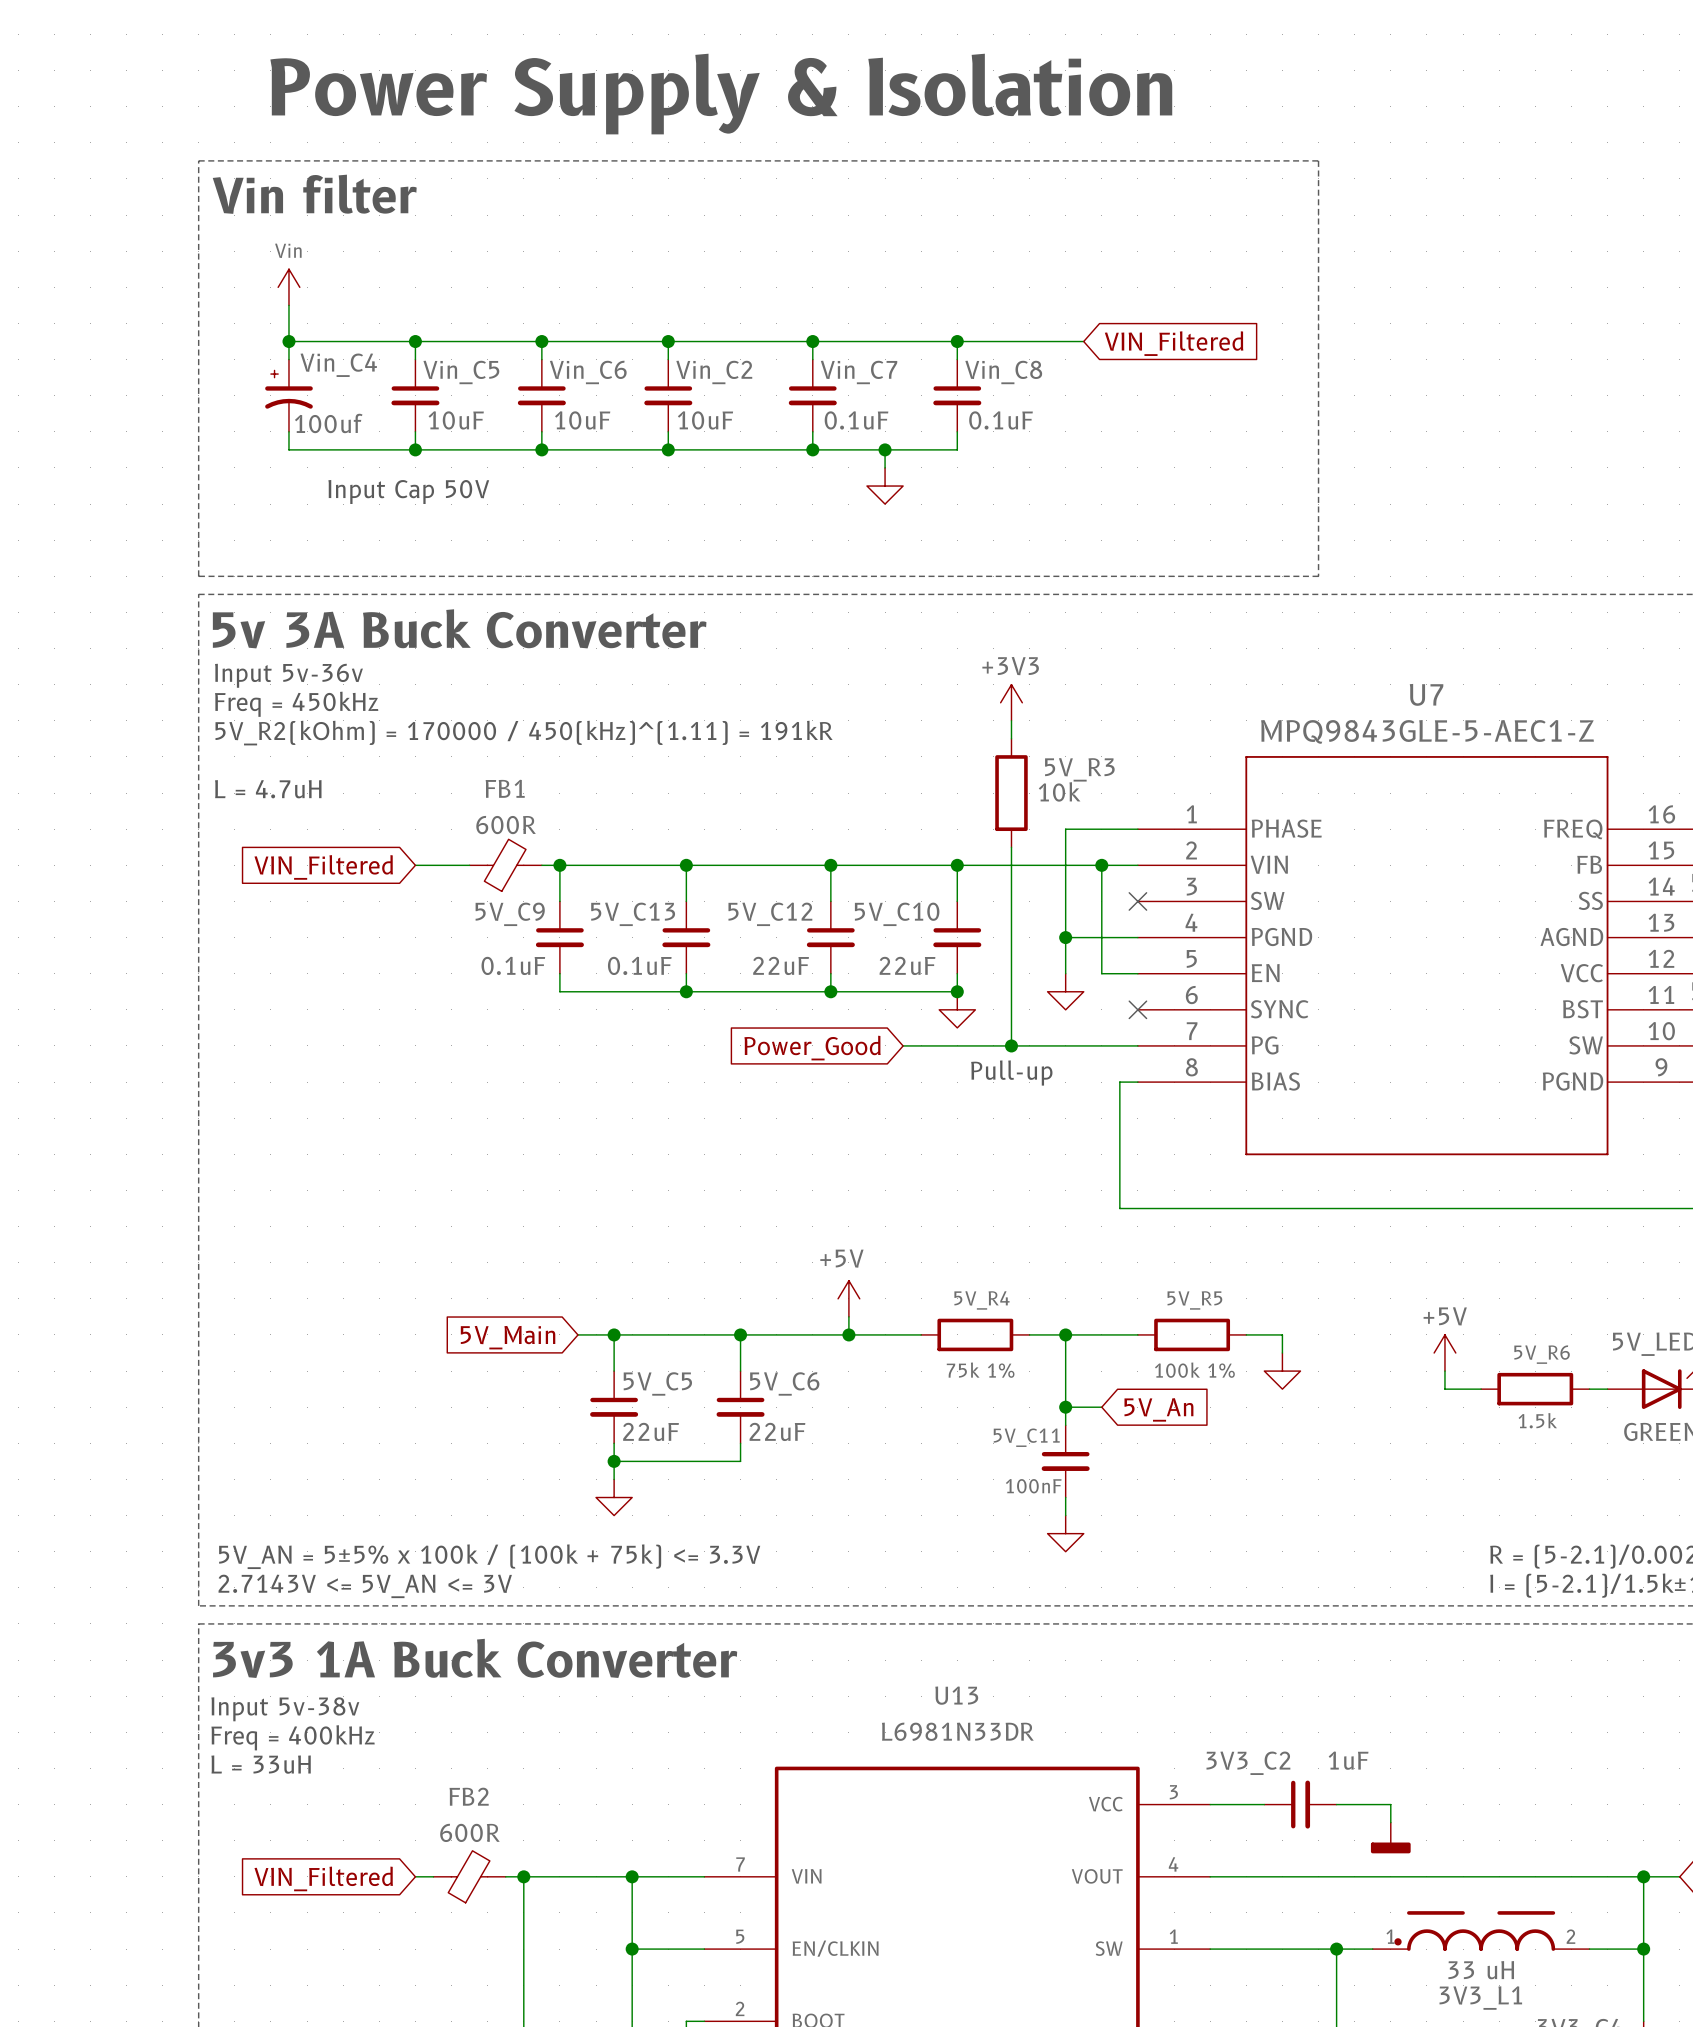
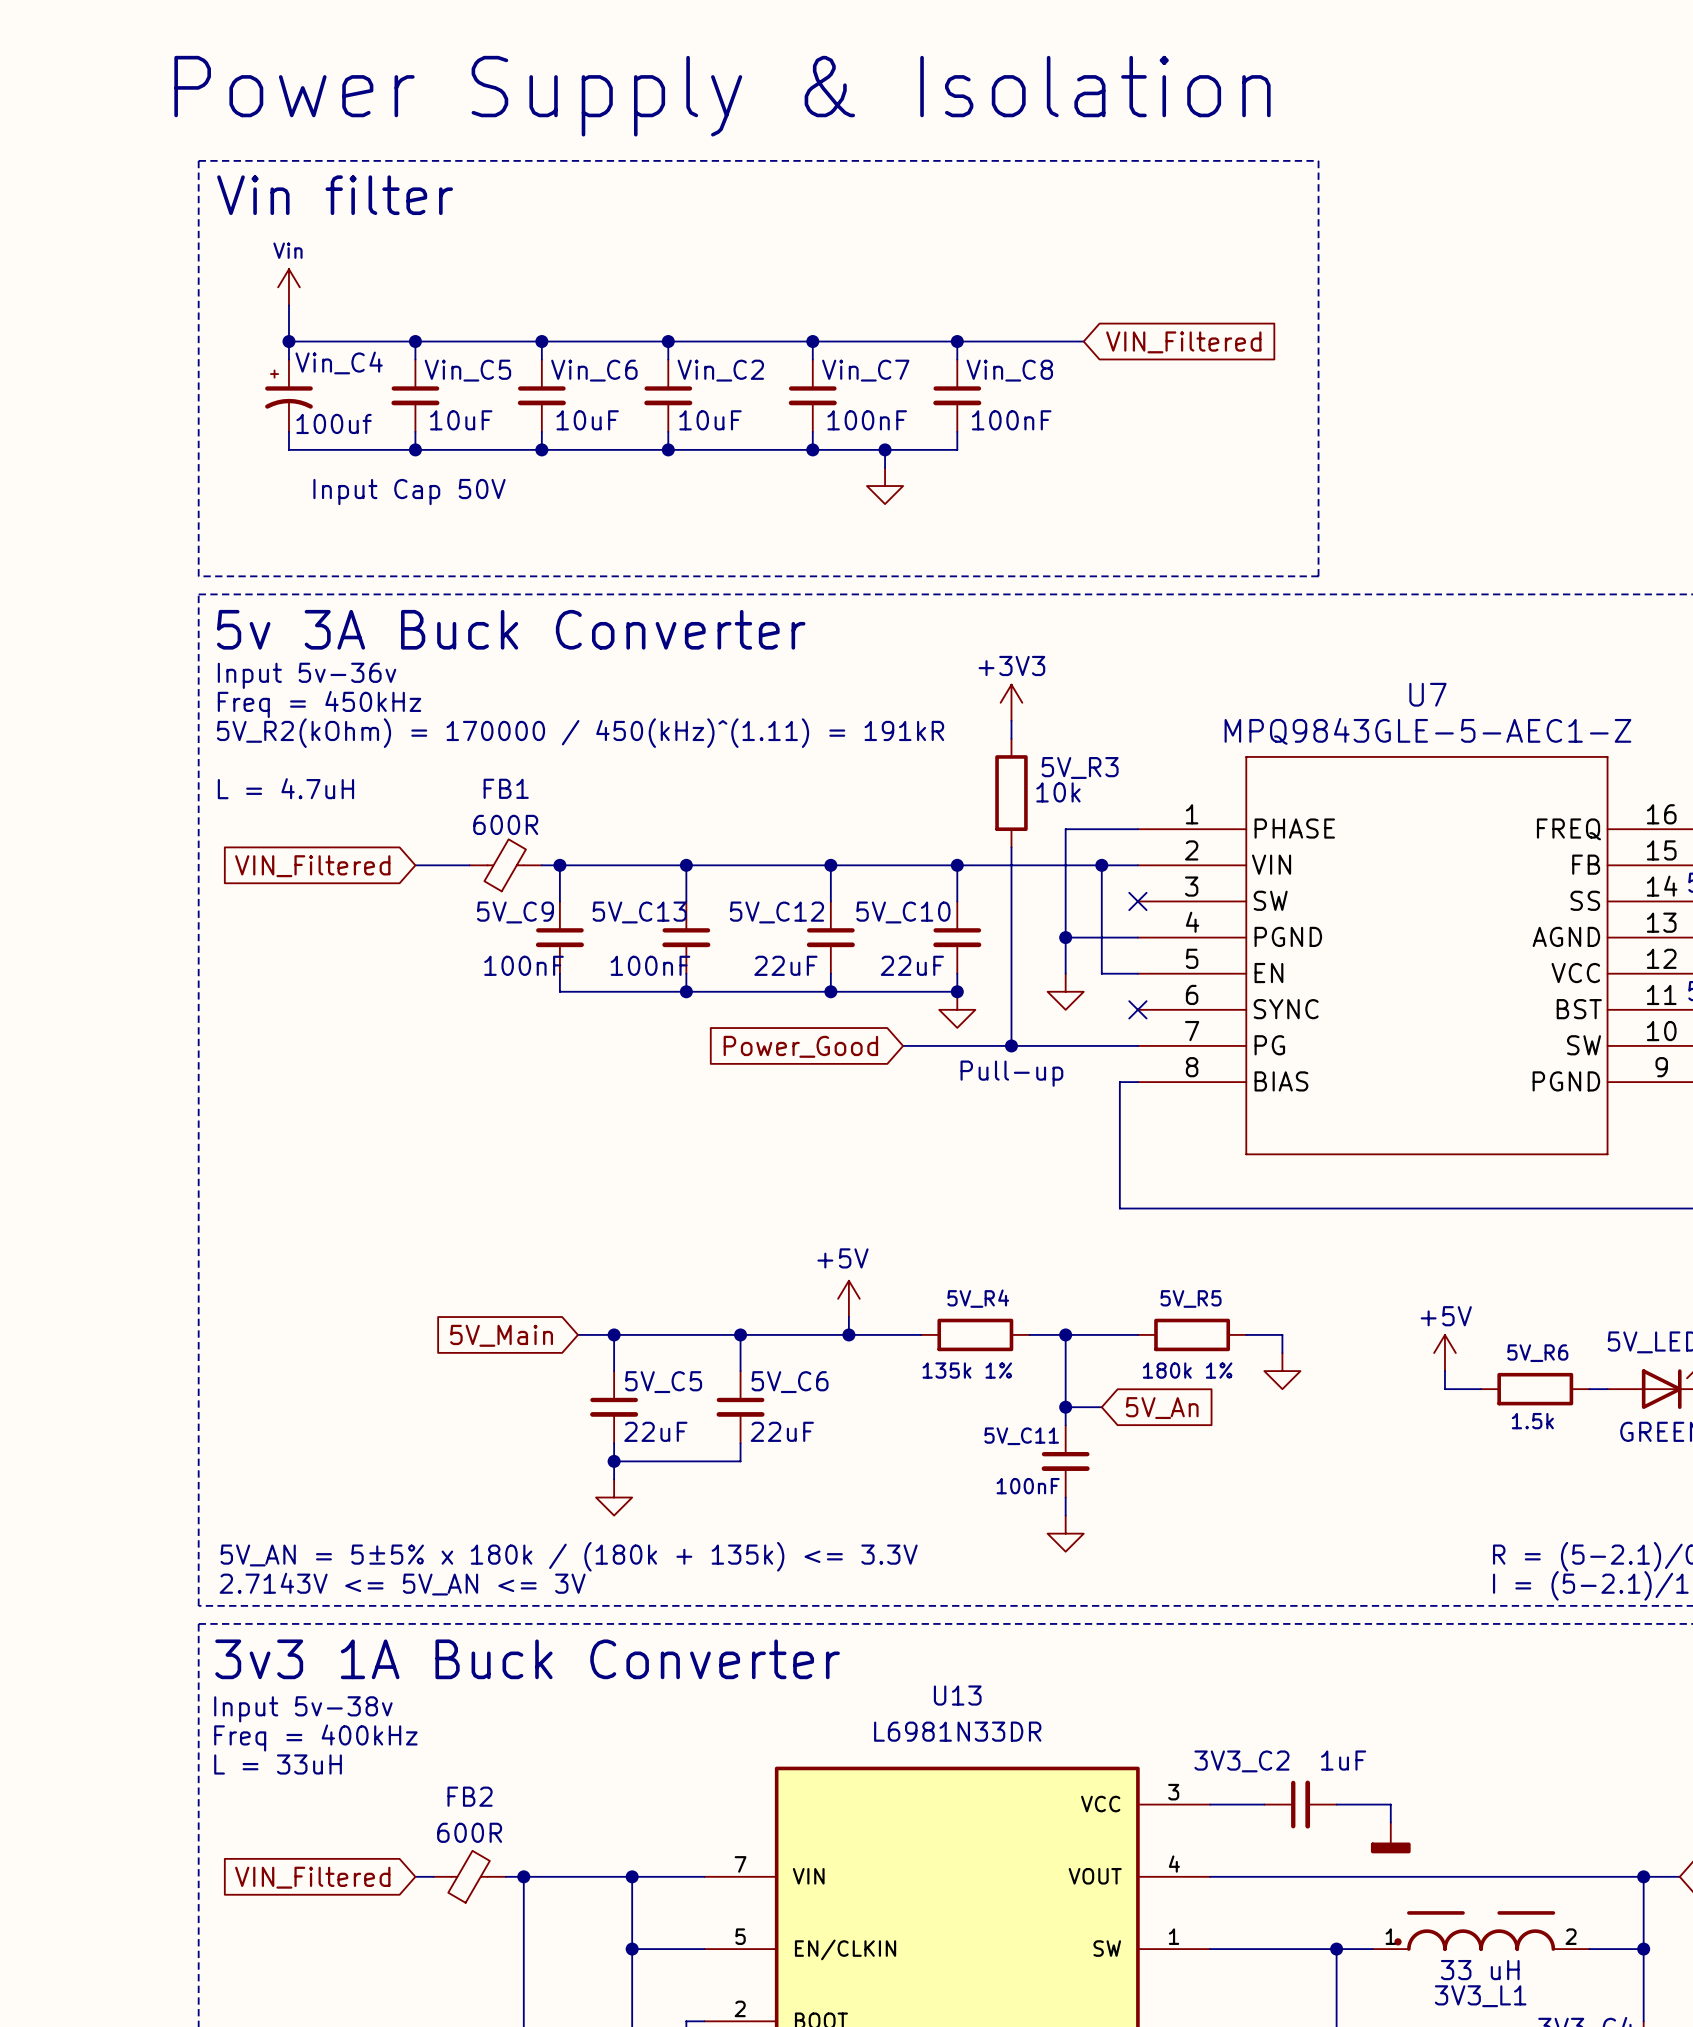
Vin_C7 value: 0.1uF (856, 420) -> 100nF (867, 420)
Vin_C8 value: 0.1uF (1001, 420) -> 100nF (1011, 420)
5V_C9 value: 0.1uF (513, 965) -> 100nF (524, 965)
5V_C13 value: 0.1uF (639, 965) -> 100nF (650, 965)
5V_R4 value: 75k 1% (980, 1370) -> 135k 1% (967, 1370)
5V_R5 value: 100k 1% (1194, 1370) -> 180k 1% (1187, 1370)
text: 5V_AN = 5±5% x 100k / (100k + 75k) <= 3.3V (489, 1556) -> 5V_AN = 5±5% x 180k / (180k + 135k) <= 3.3V (569, 1556)

